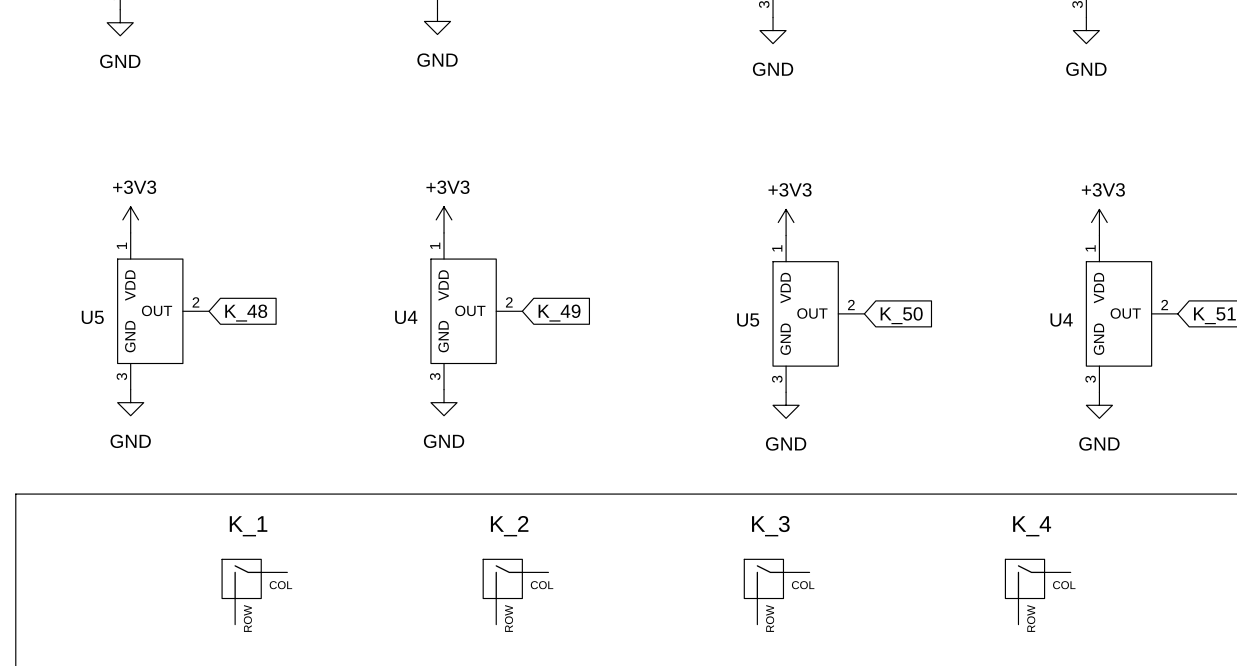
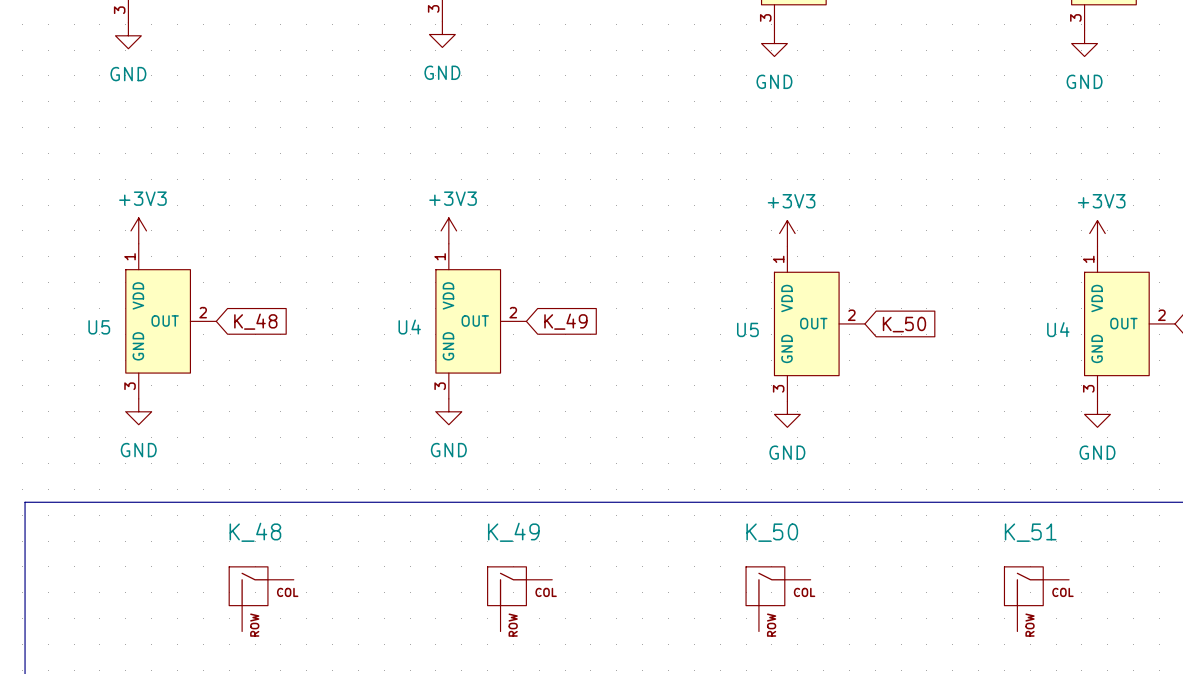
K_1 name: K_1 (248, 526) -> K_48 (255, 532)
K_2 name: K_2 (509, 526) -> K_49 (513, 532)
K_3 name: K_3 (770, 526) -> K_50 (772, 532)
K_4 name: K_4 (1032, 526) -> K_51 (1030, 532)

